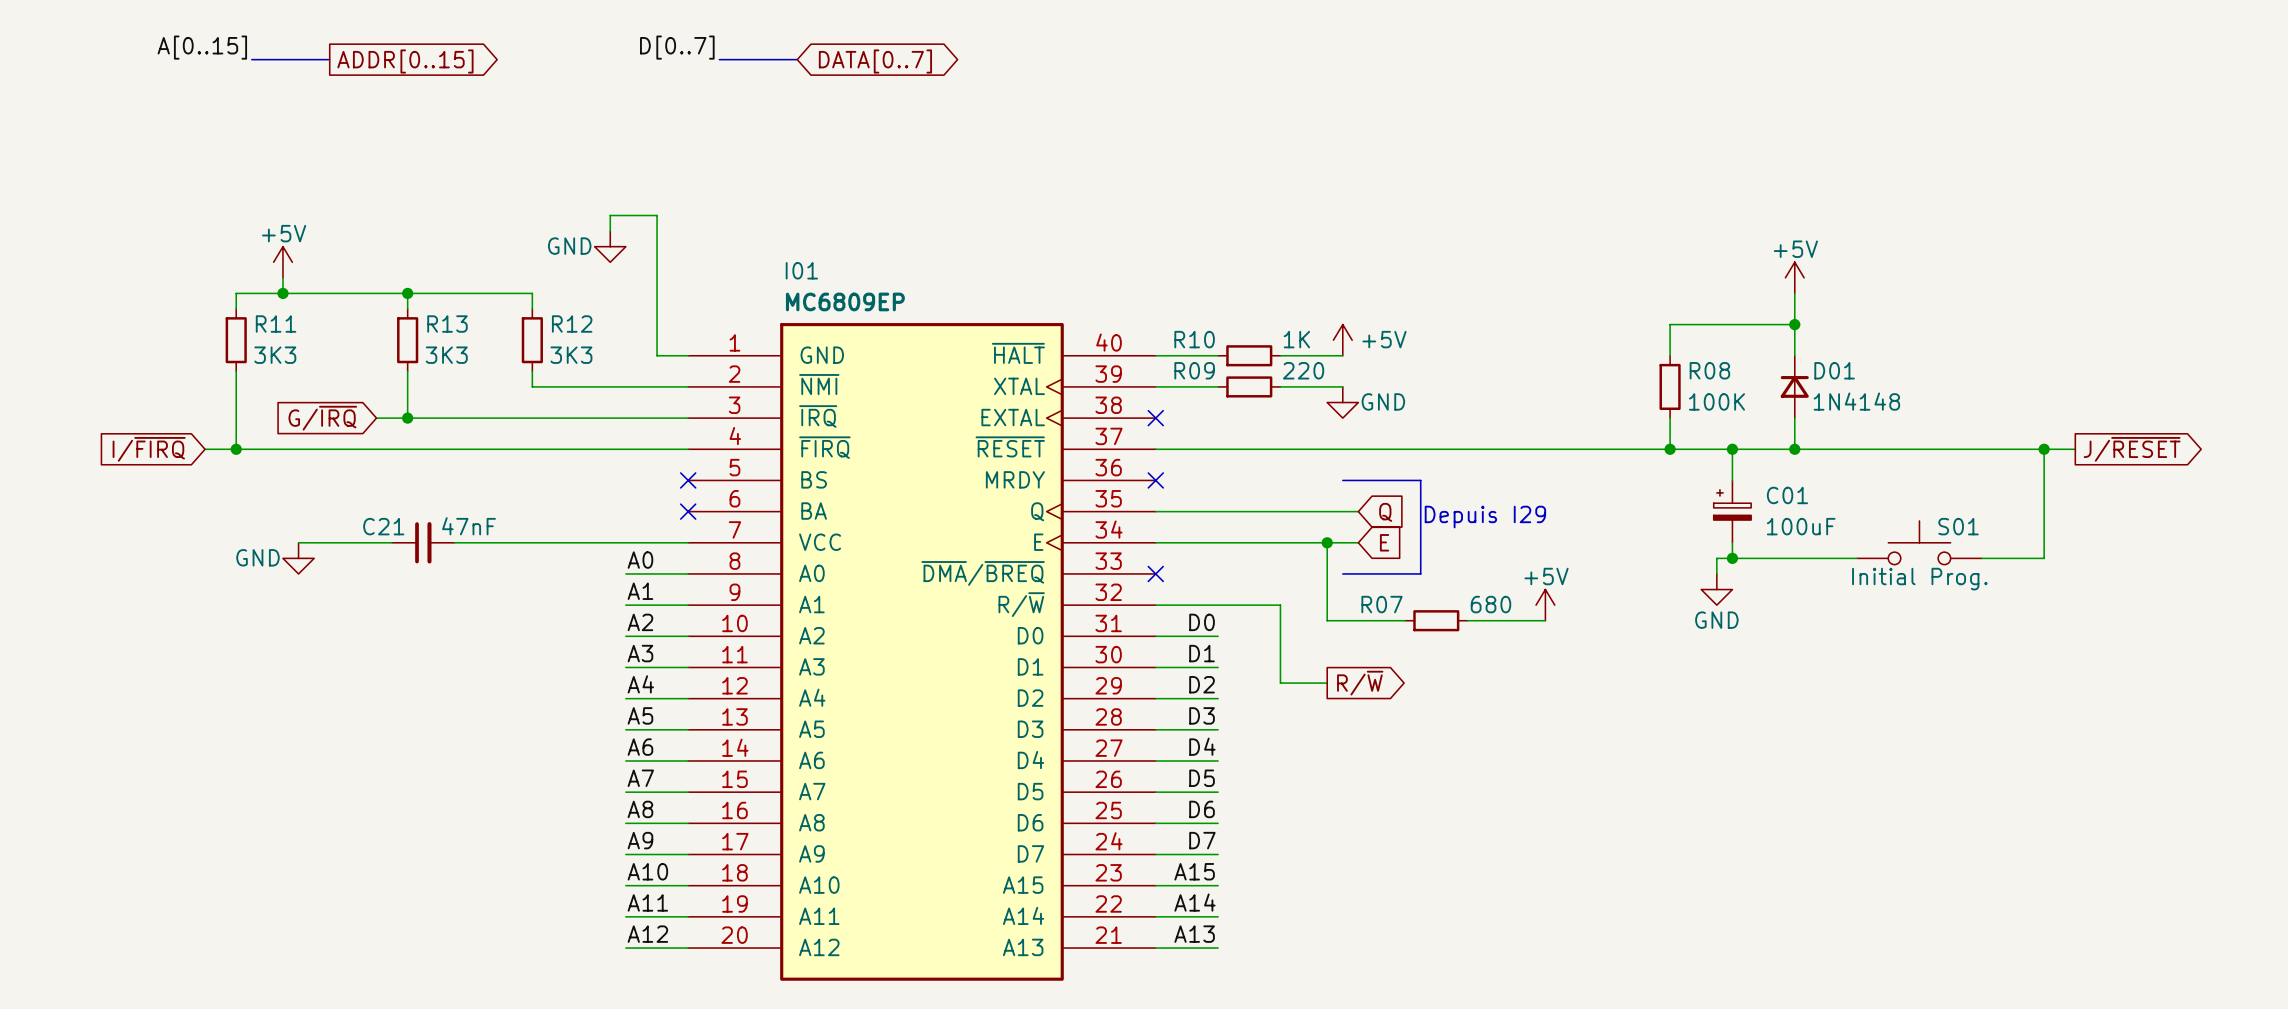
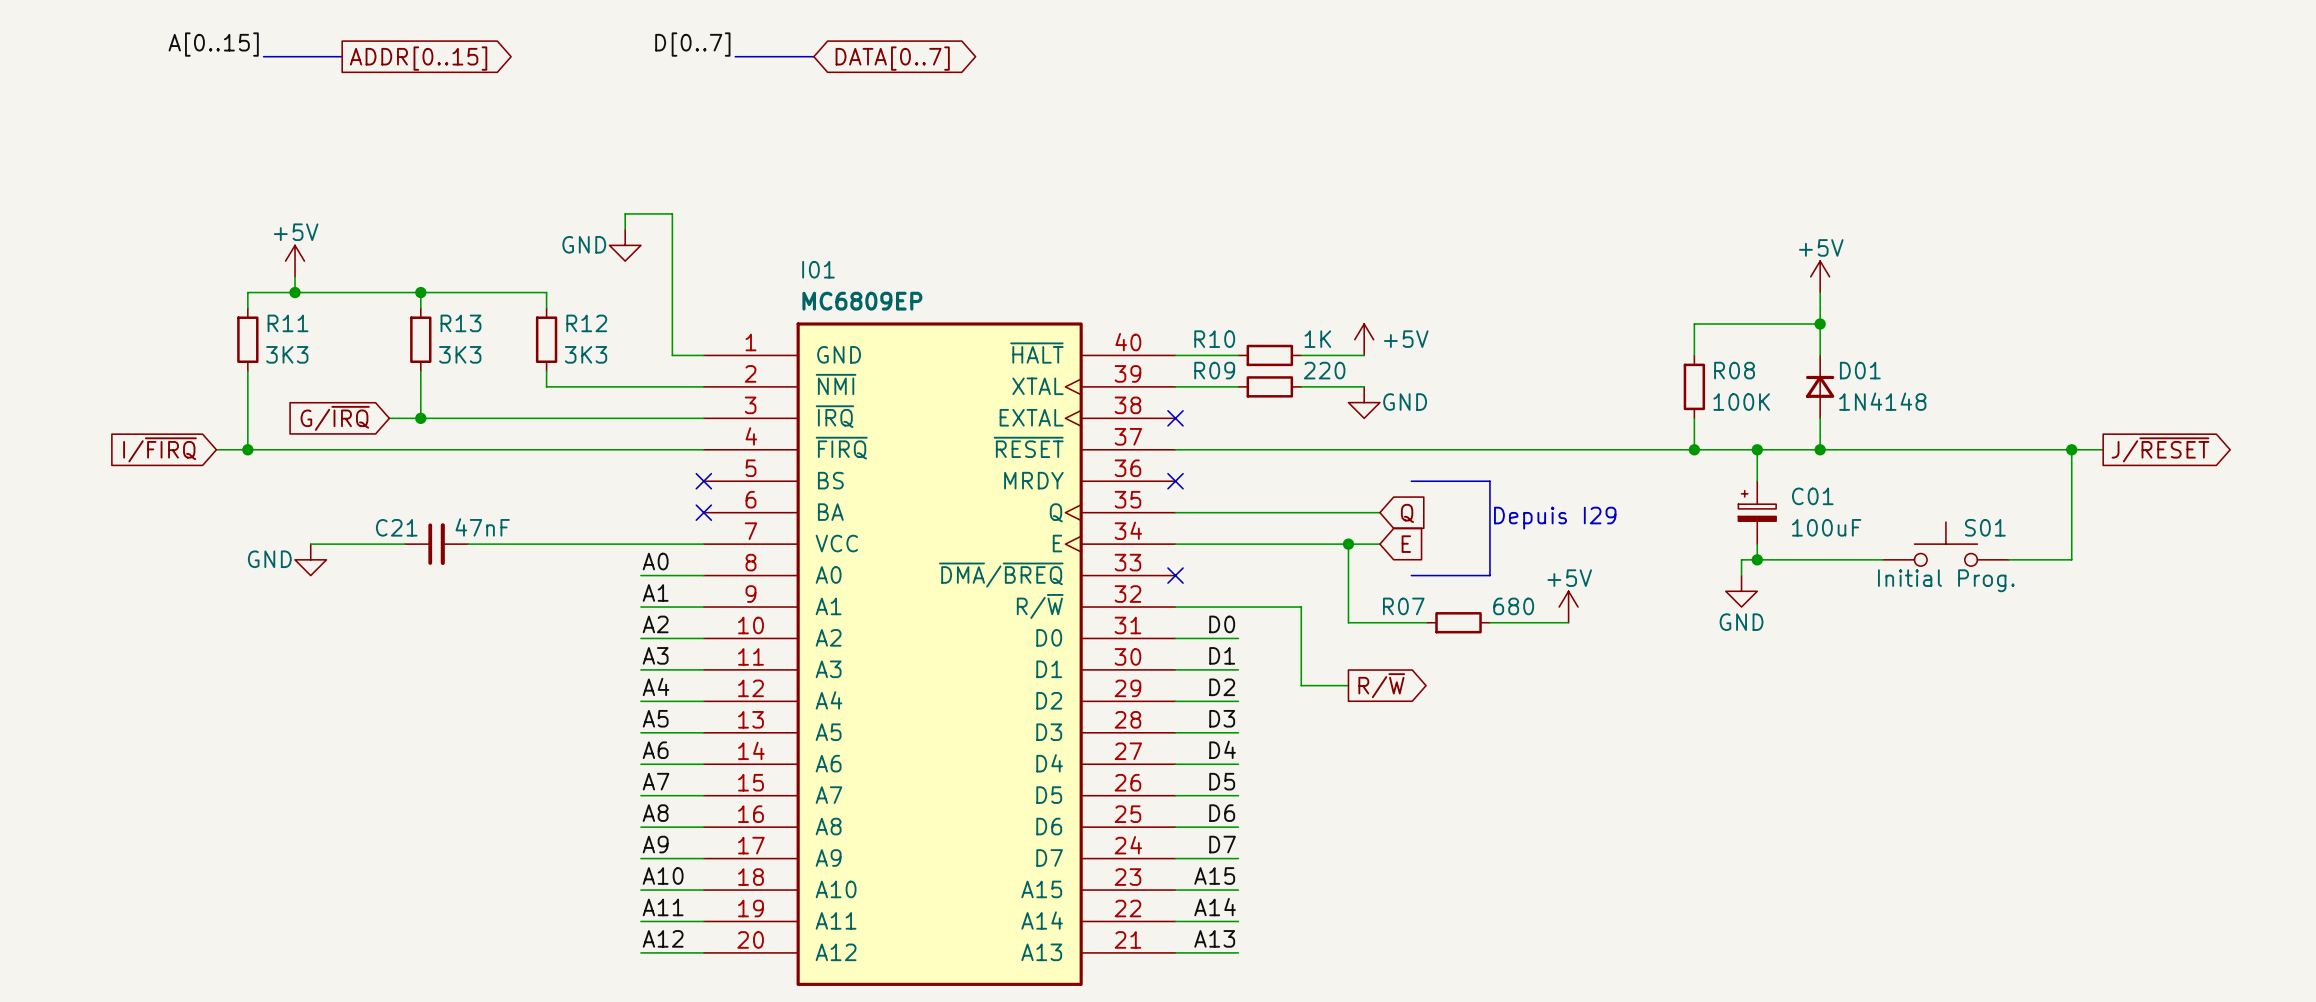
line: (1342, 480) (1389, 480) -> none
line: (1420, 480) (1420, 573) -> (1442, 481) (1489, 481) (1489, 575) (1442, 575)
text position: Depuis I29 (1485, 517) -> Depuis I29 (1555, 518)
line: (1342, 573) (1389, 573) -> none

